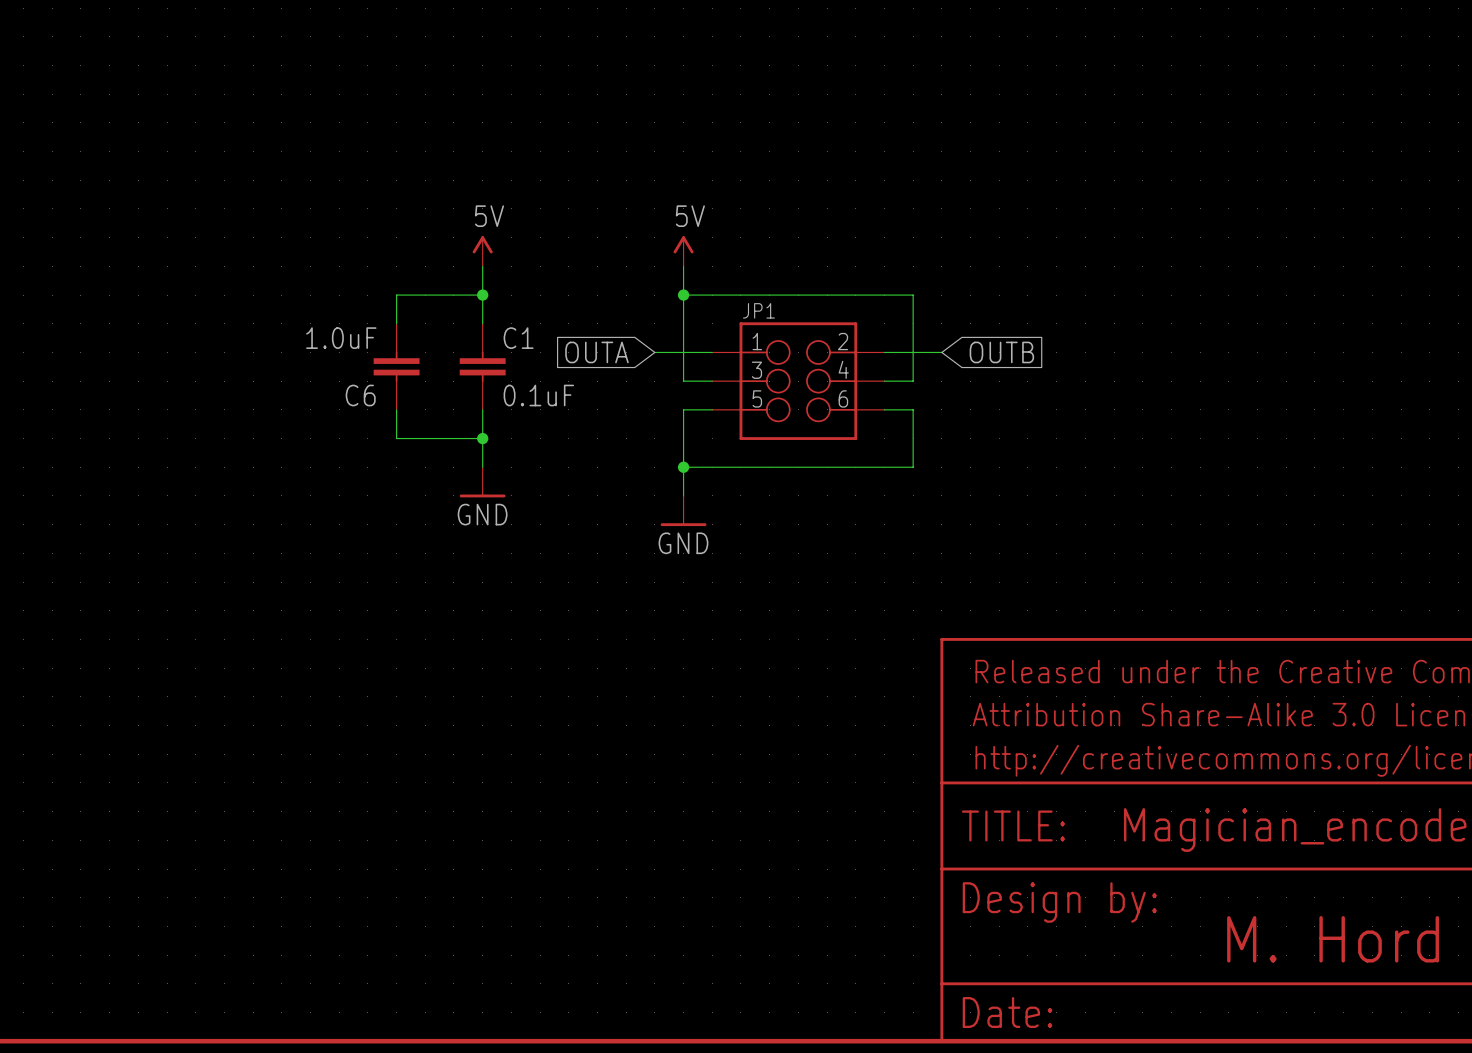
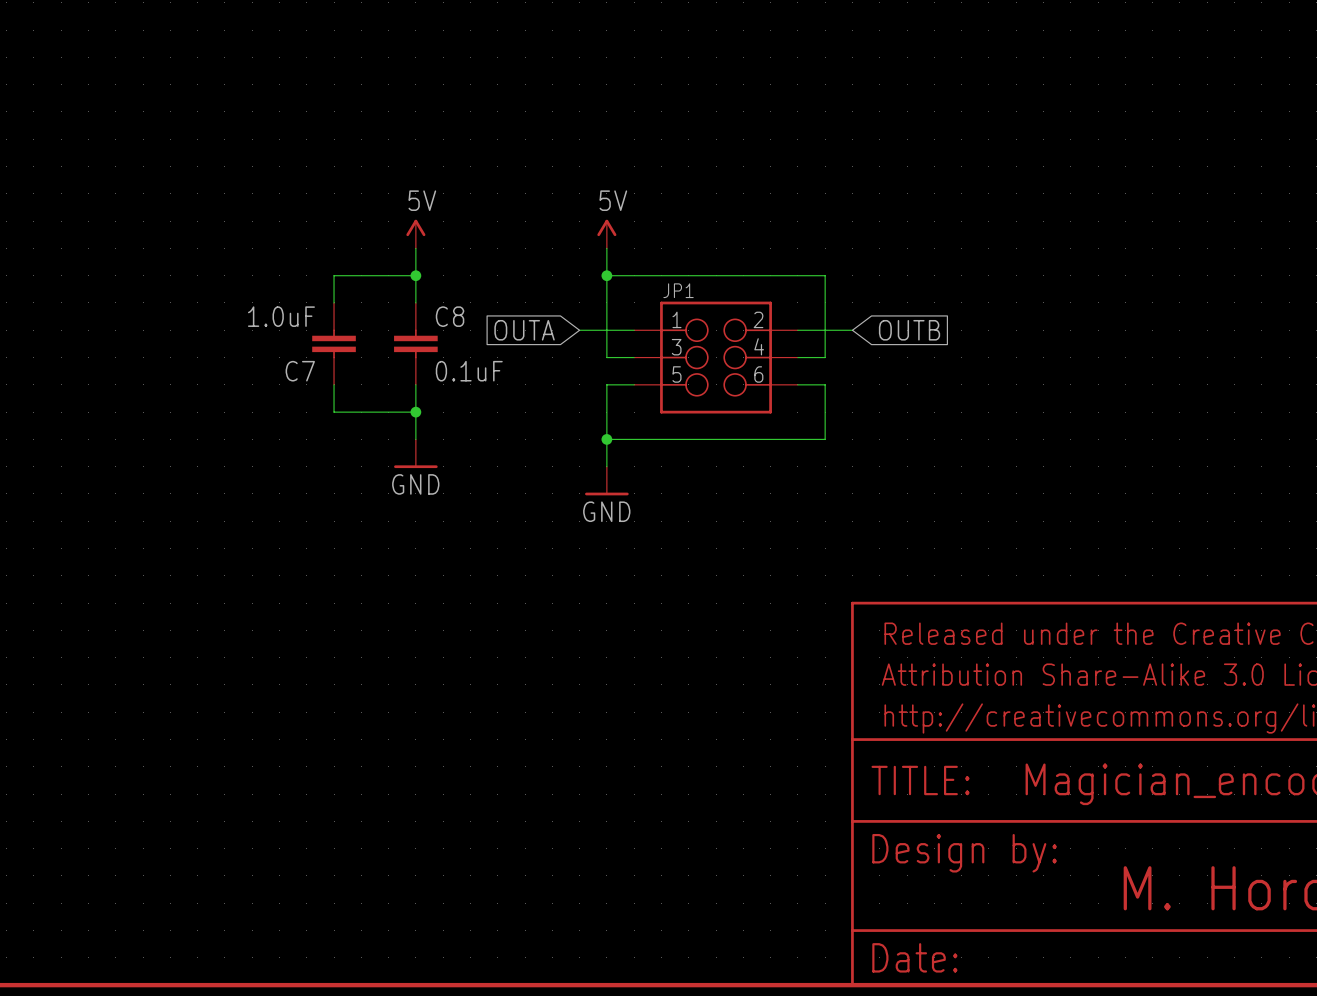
C1 name: C1 (518, 338) -> C8 (450, 316)
C6 name: C6 (360, 395) -> C7 (300, 371)

